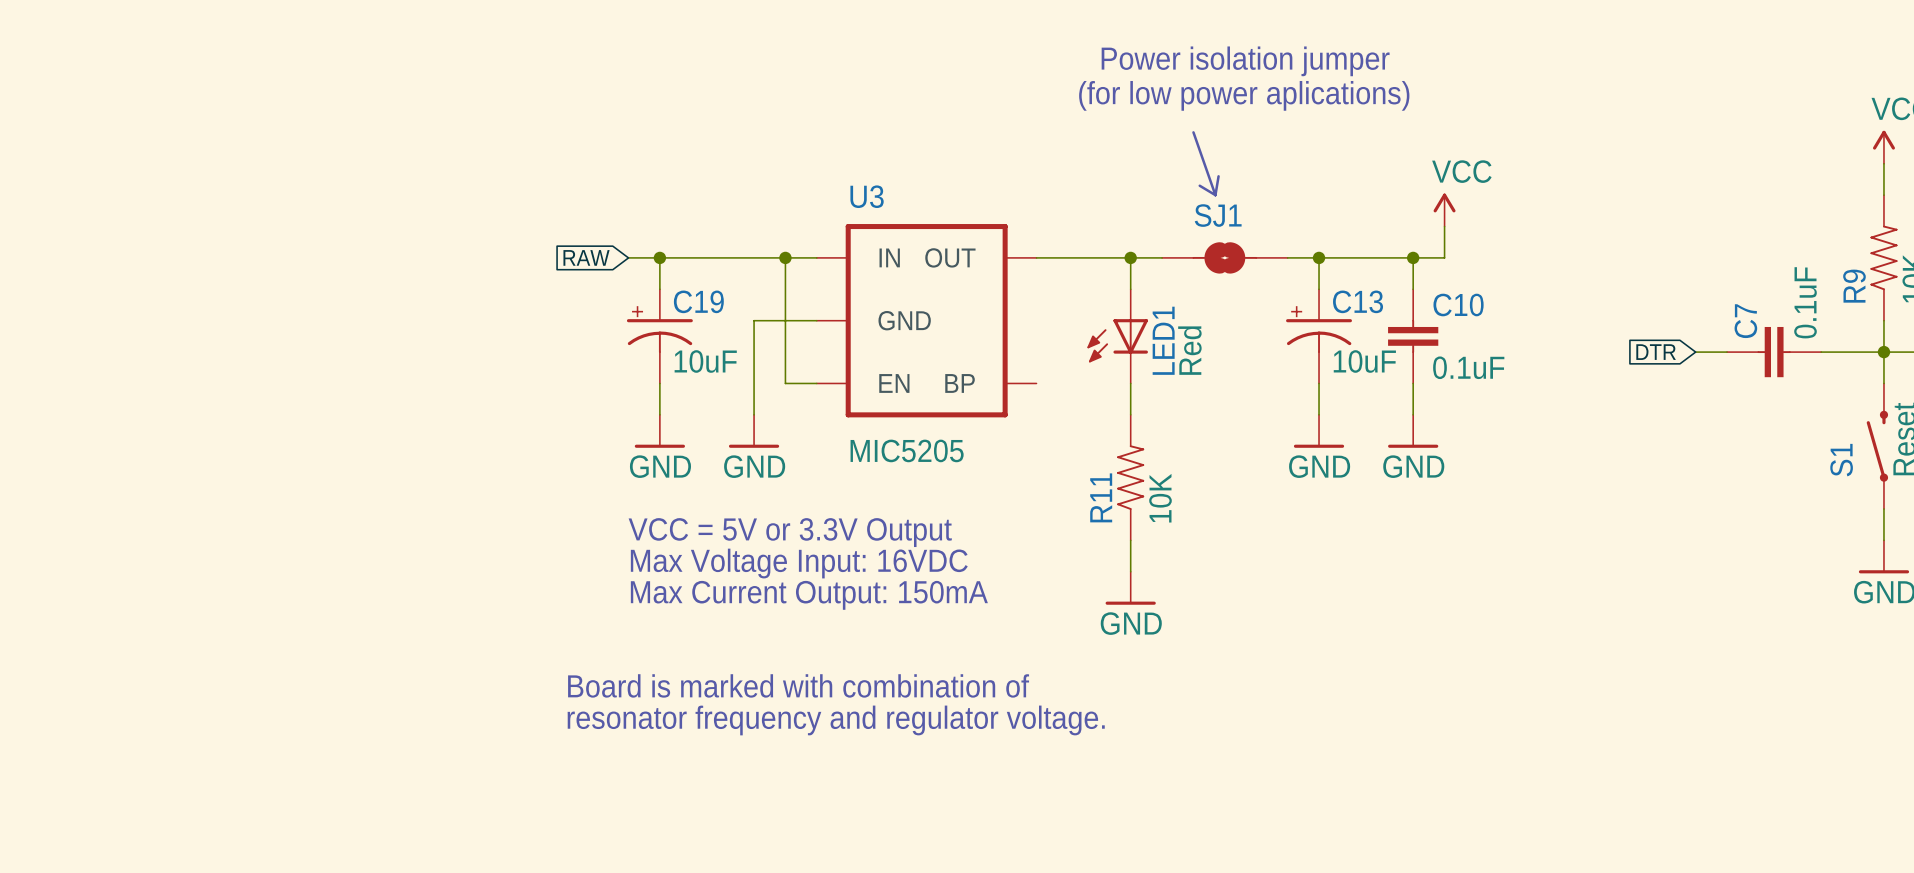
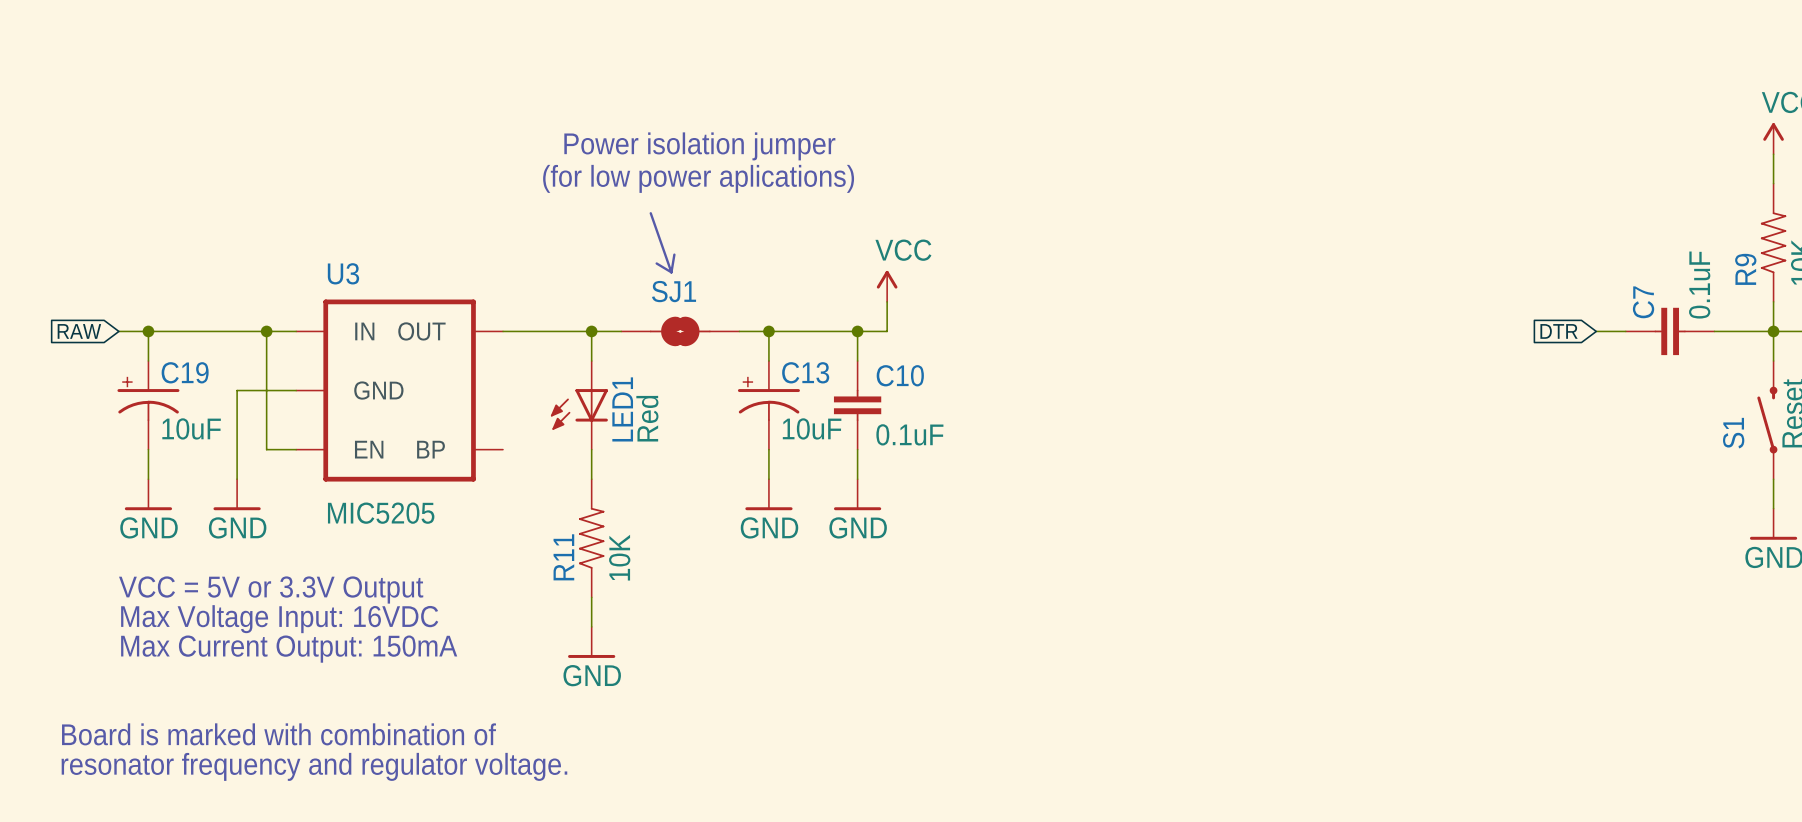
text: Power isolation jumper (1245, 61) -> none
text: (for low power aplications) (1244, 95) -> none
line: (1193, 132) (1215, 195) -> none
text: none -> Power isolation jumper (699, 146)
line: (1218, 176) (1215, 195) -> none
line: (1199, 185) (1215, 195) -> none
text: none -> (for low power aplications) (698, 178)
power symbol: VCC (1444, 210) -> none
line: none -> (650, 213) (671, 272)
wire: (1444, 226) (1444, 257) (1287, 257) -> none
global label: RAW (586, 257) -> none
wire: (628, 257) (816, 257) -> none
wire: (659, 257) (659, 289) -> (591, 331) (591, 360)
junction: (659, 257) -> none
wire: (785, 257) (785, 383) (816, 383) -> (768, 331) (768, 360)
junction: (785, 257) -> none
wire: (1036, 257) (1162, 257) -> none
wire: (1130, 257) (1130, 289) -> (857, 331) (857, 360)
junction: (1130, 257) -> none
SJ1 position: (1224, 257) -> (680, 331)
wire: (1319, 257) (1319, 289) -> none
junction: (1319, 257) -> none
wire: (1413, 257) (1413, 289) -> none
junction: (1413, 257) -> none
line: none -> (674, 254) (671, 272)
line: none -> (656, 263) (671, 272)
power symbol: none -> VCC (887, 286)
wire: (816, 320) (754, 320) (754, 414) -> none
U3 position: (926, 320) -> (399, 390)
wire: none -> (887, 301) (887, 331) (739, 331)
C19 position: (659, 336) -> (148, 405)
LED1 position: (1117, 336) -> (579, 405)
C13 position: (1319, 336) -> (768, 405)
C10 position: (1413, 336) -> (857, 405)
global label: none -> RAW (79, 331)
wire: none -> (118, 331) (296, 331)
wire: none -> (148, 331) (148, 360)
junction: none -> (148, 331)
wire: none -> (266, 331) (266, 449) (296, 449)
junction: none -> (266, 331)
wire: none -> (503, 331) (621, 331)
junction: none -> (591, 331)
junction: none -> (768, 331)
junction: none -> (857, 331)
wire: (659, 383) (659, 414) -> (591, 449) (591, 479)
wire: (1130, 383) (1130, 414) -> (857, 449) (857, 479)
wire: (1319, 383) (1319, 414) -> none
wire: (1413, 383) (1413, 414) -> none
wire: none -> (296, 390) (237, 390) (237, 479)
power symbol: GND (659, 431) -> none
power symbol: GND (754, 431) -> none
power symbol: GND (1319, 431) -> none
power symbol: GND (1413, 431) -> none
wire: none -> (148, 449) (148, 479)
wire: none -> (768, 449) (768, 479)
R11 position: (1130, 477) -> (591, 538)
power symbol: none -> GND (148, 494)
power symbol: none -> GND (237, 494)
power symbol: none -> GND (768, 494)
power symbol: none -> GND (857, 494)
text: VCC = 5V or 3.3V Output (790, 532) -> none
wire: (1130, 540) (1130, 571) -> none
text: Max Voltage Input: 16VDC (799, 563) -> none
power symbol: GND (1130, 588) -> none
text: Max Current Output: 150mA (809, 595) -> none
text: none -> VCC = 5V or 3.3V Output (271, 589)
wire: none -> (591, 597) (591, 626)
text: none -> Max Voltage Input: 16VDC (279, 619)
power symbol: none -> GND (591, 642)
text: Board is marked with combination of (798, 685) -> none
text: none -> Max Current Output: 150mA (289, 649)
text: resonator frequency and regulator voltage. (836, 720) -> none
text: none -> Board is marked with combination of (279, 734)
text: none -> resonator frequency and regulator voltage. (314, 766)

